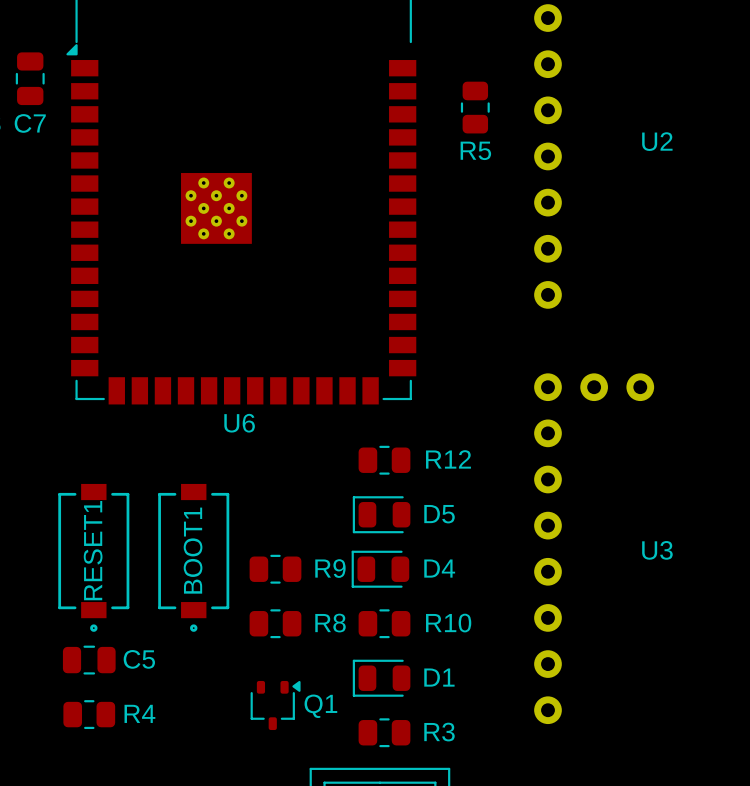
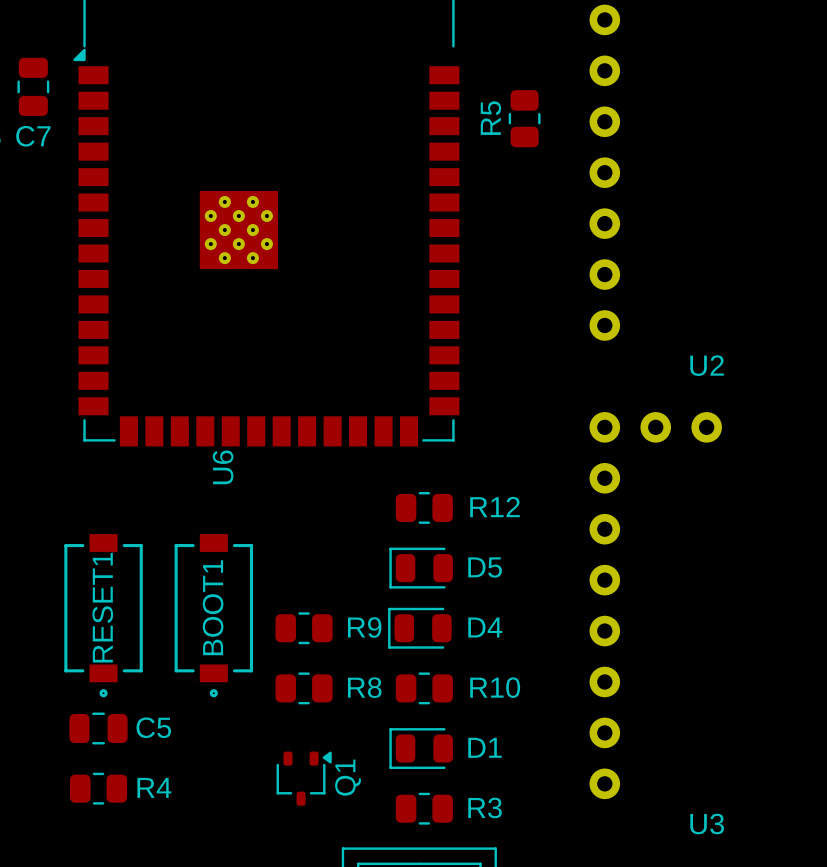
U2 name position: U2 (657, 141) -> U2 (707, 365)
R5 name rotation: 0° (475, 150) -> 90° counterclockwise (490, 118)
R5 name position: R5 (475, 150) -> R5 (490, 118)
U6 name rotation: 0° (239, 423) -> 90° counterclockwise (223, 467)
U3 name position: U3 (657, 550) -> U3 (707, 823)
Q1 name rotation: 0° (320, 706) -> 90° counterclockwise (348, 777)

